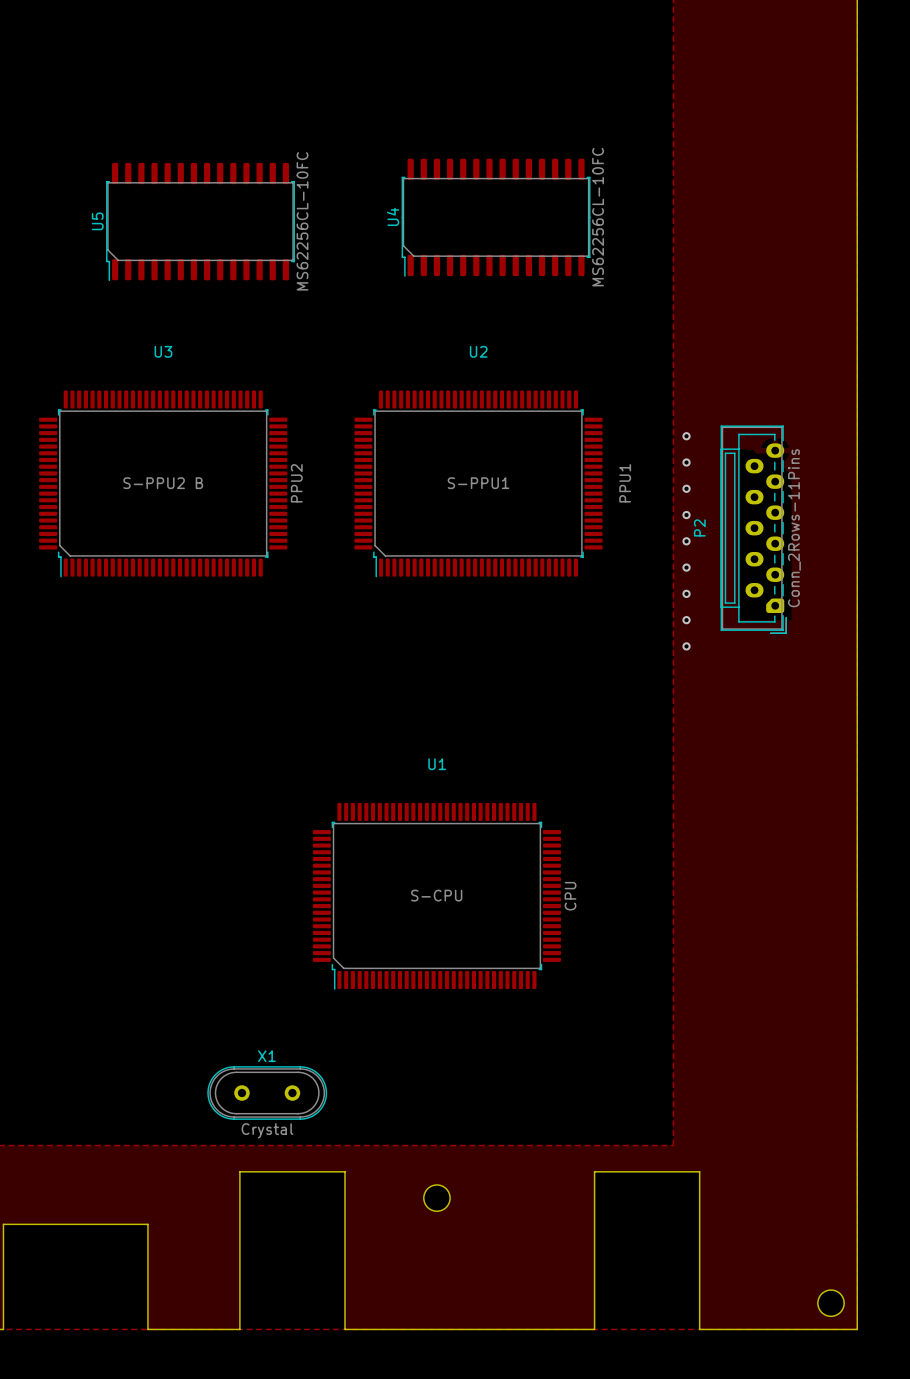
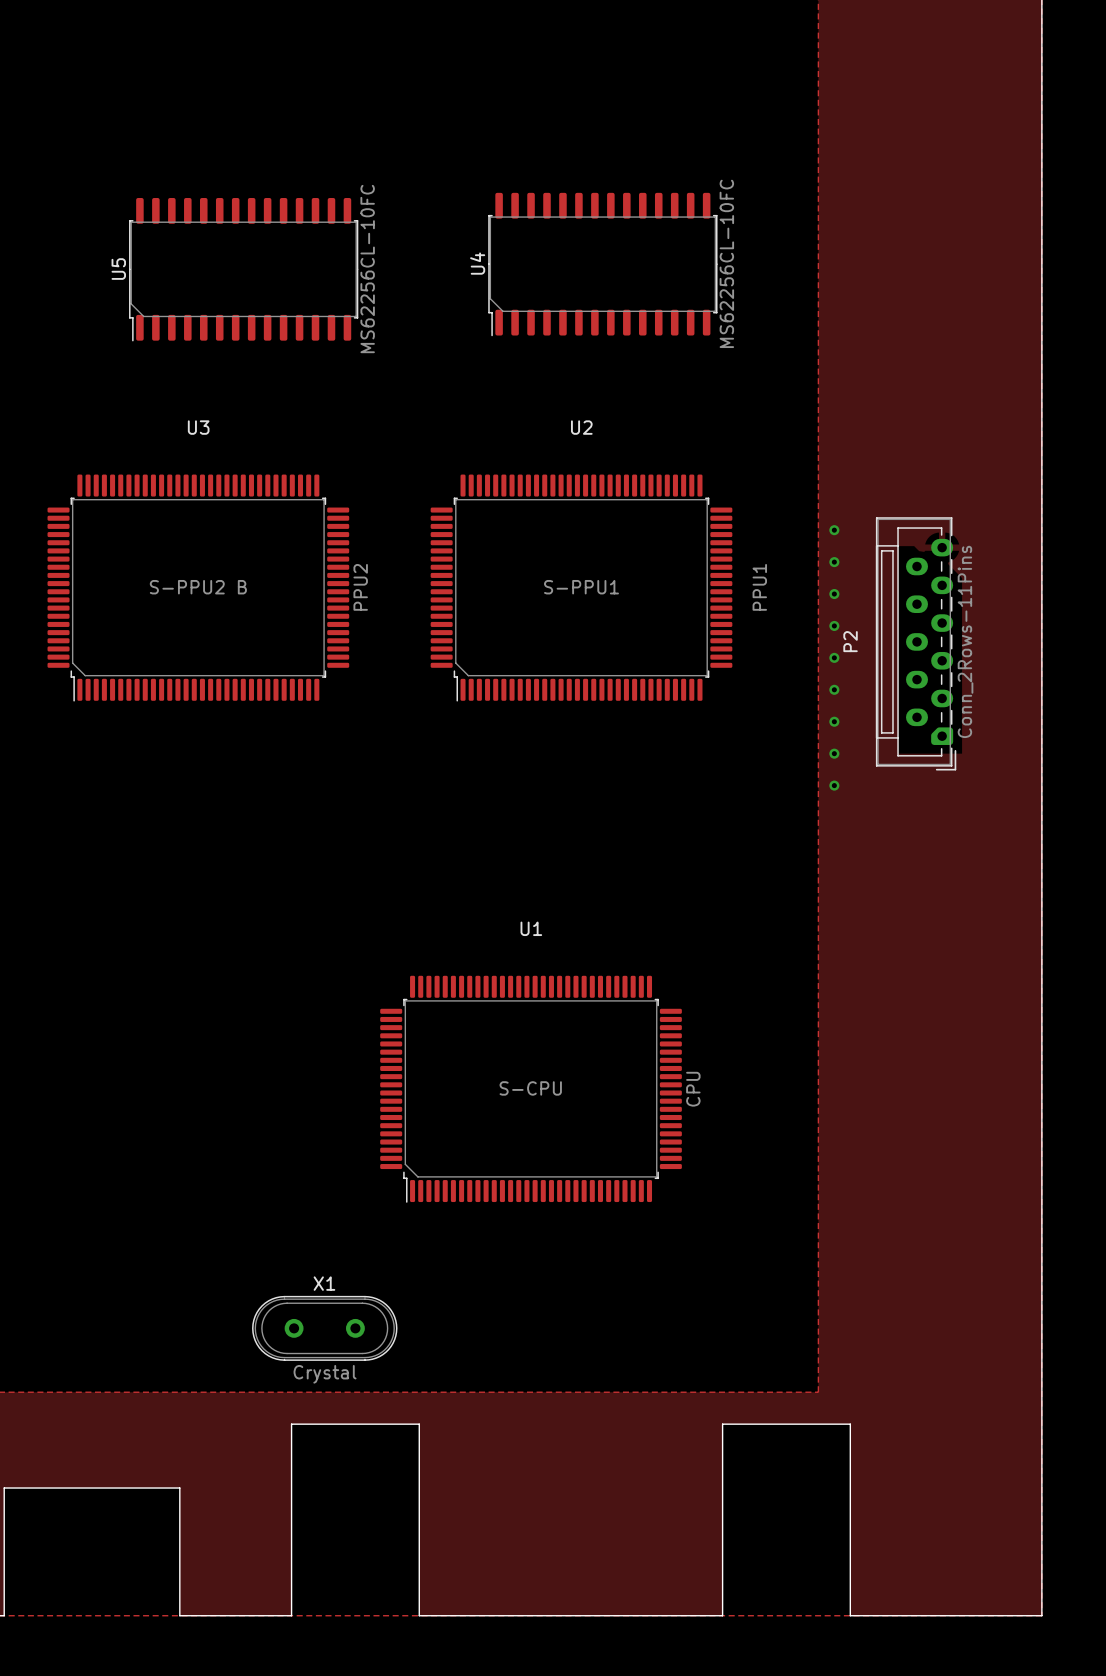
round board edge: [423, 1184, 451, 1212] -> none
round board edge: [817, 1289, 845, 1317] -> none

